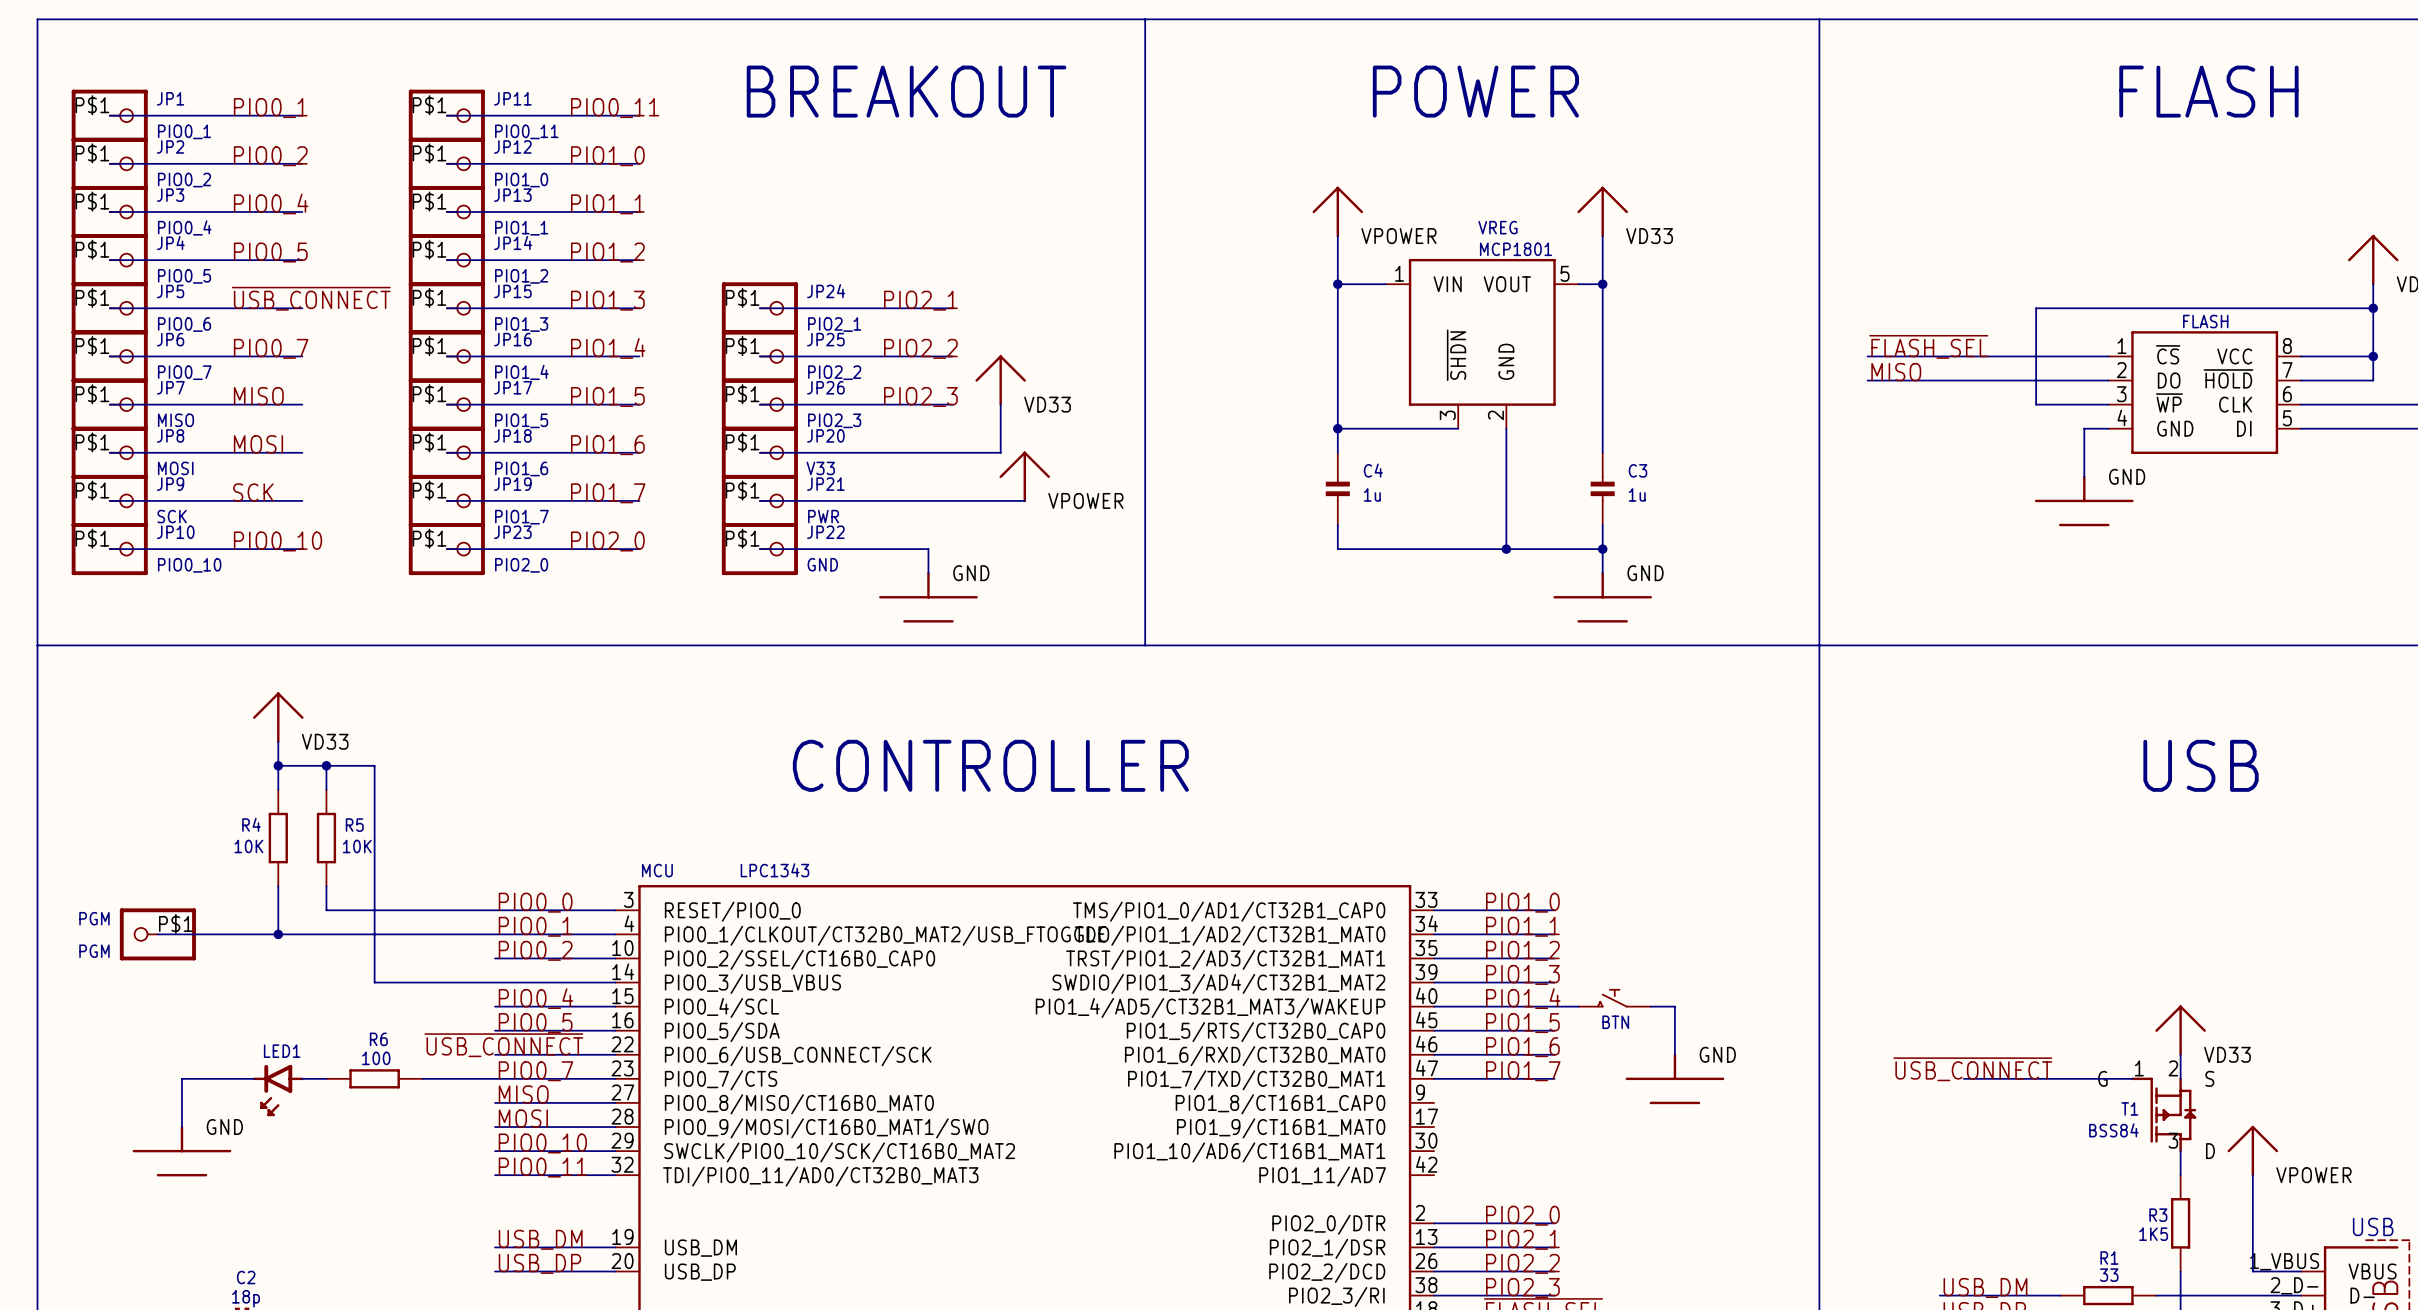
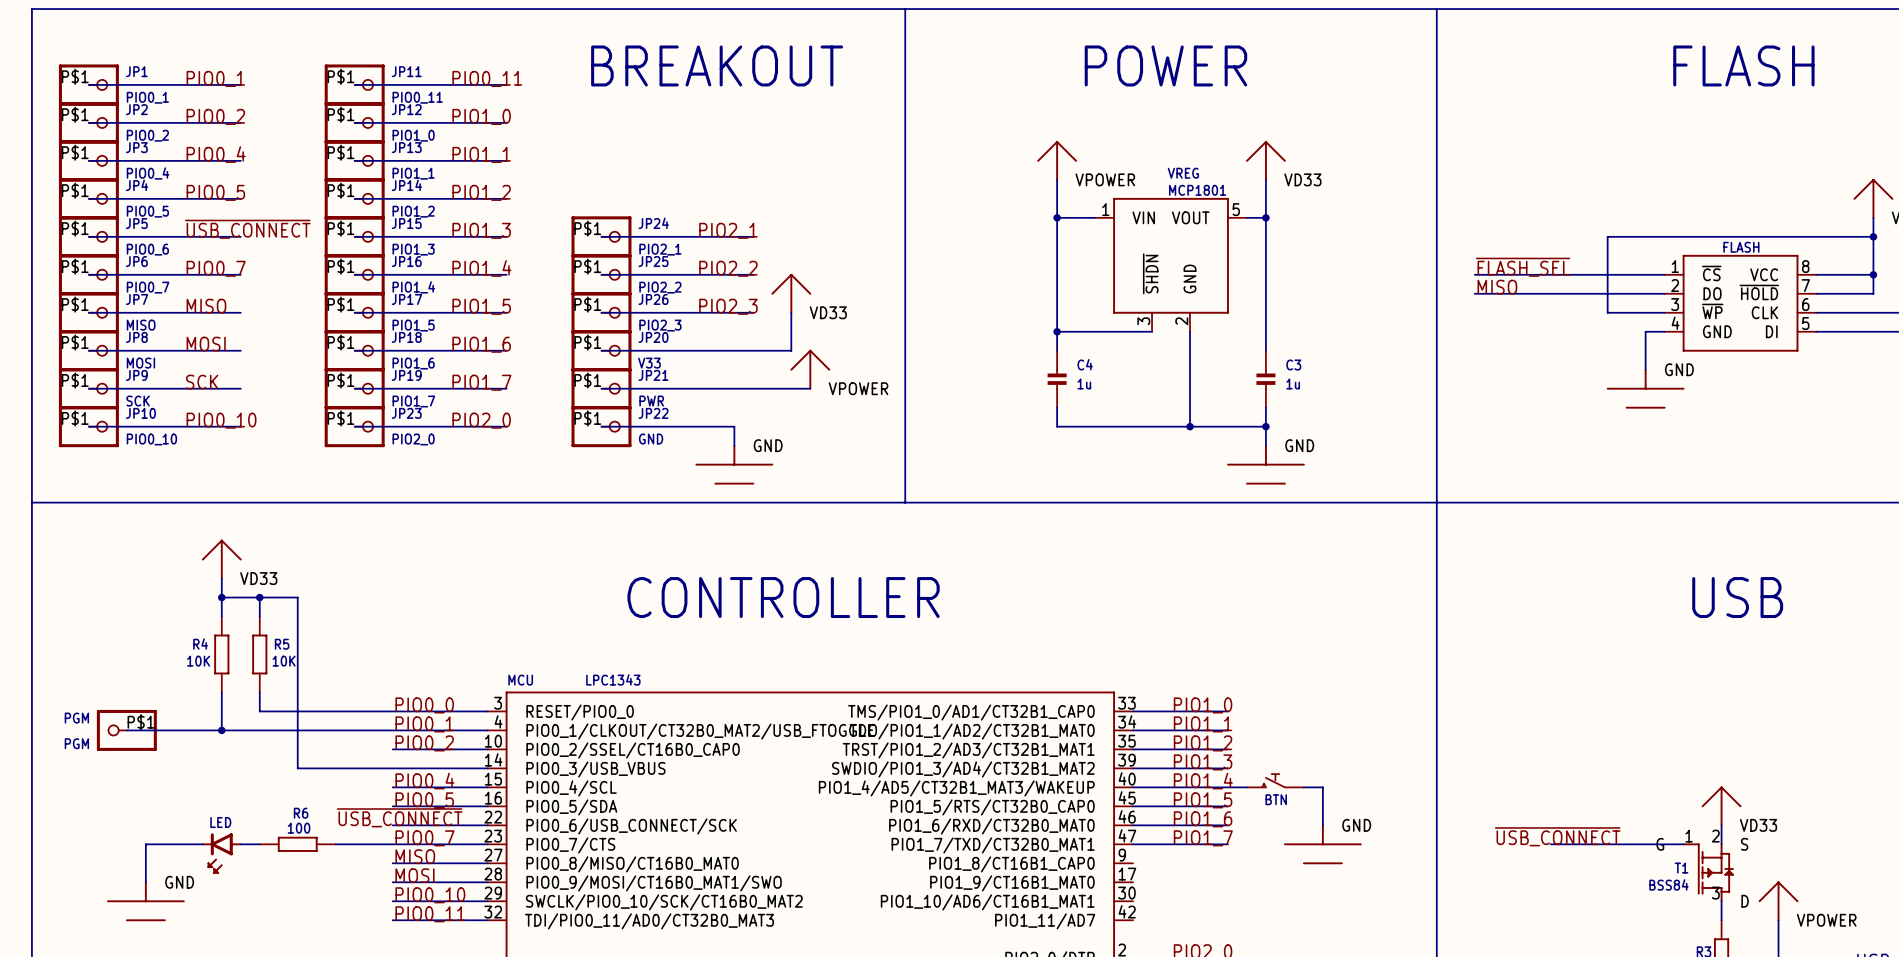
LED1 name: LED1 (282, 1051) -> LED (220, 822)

